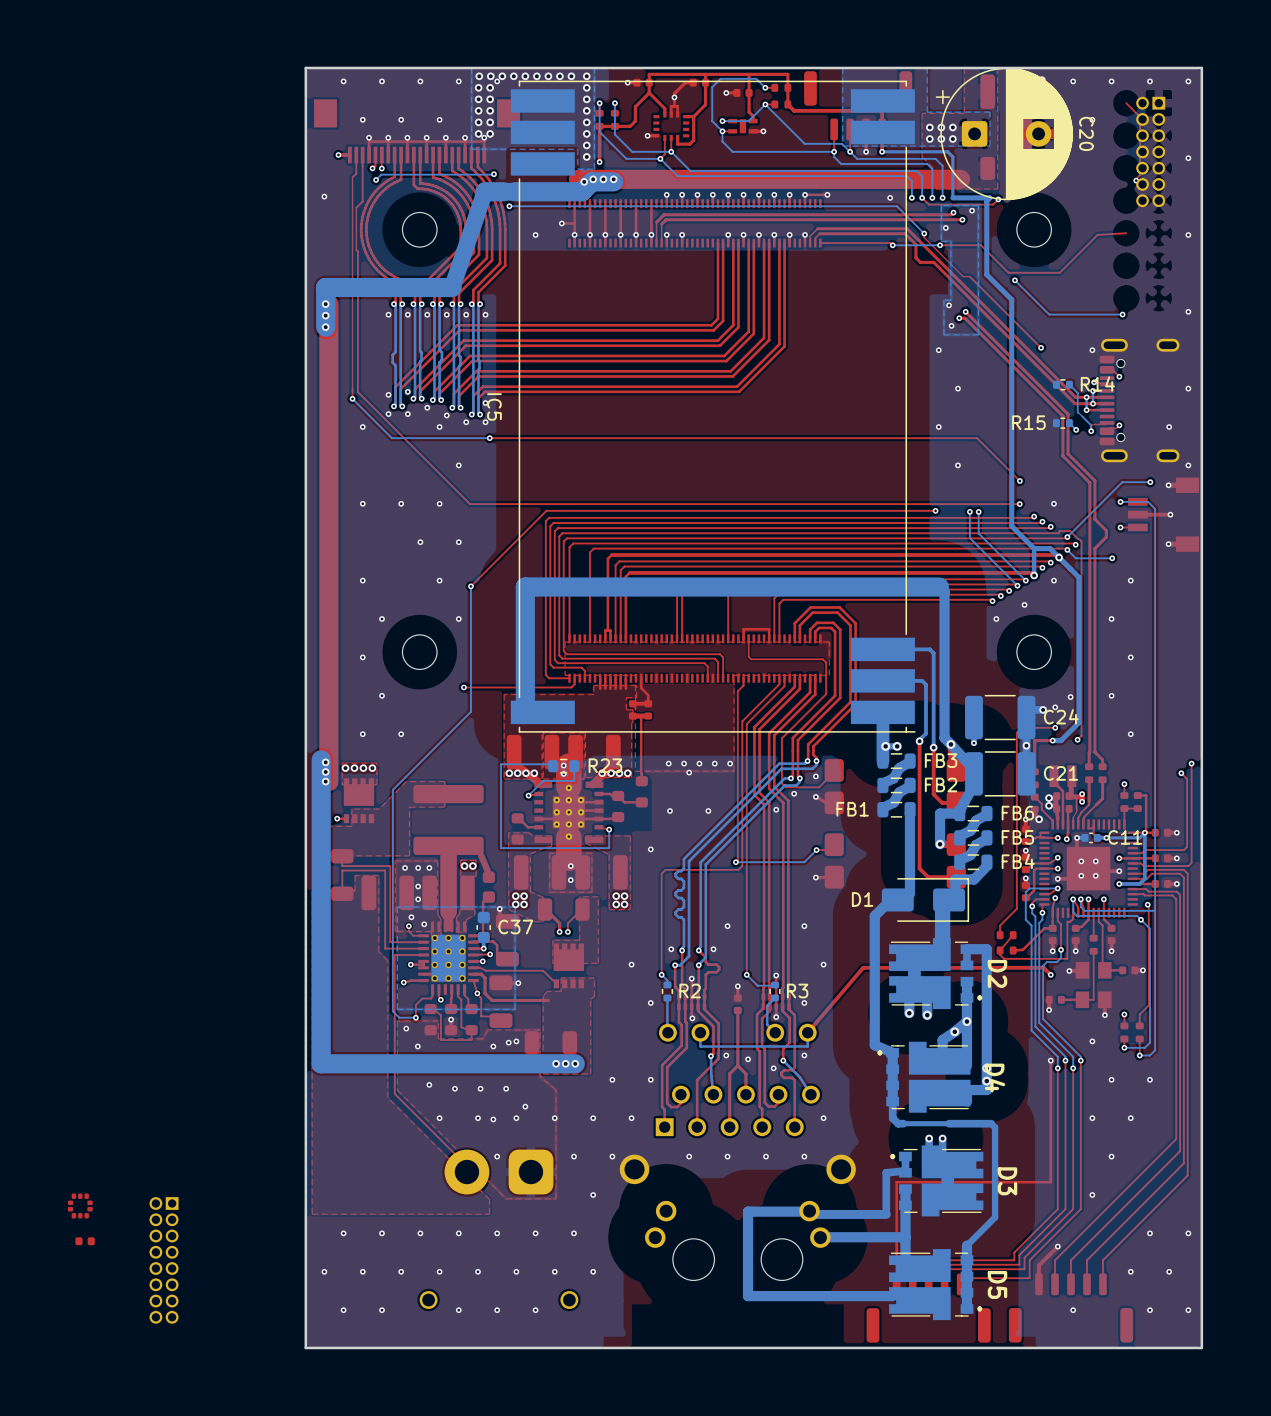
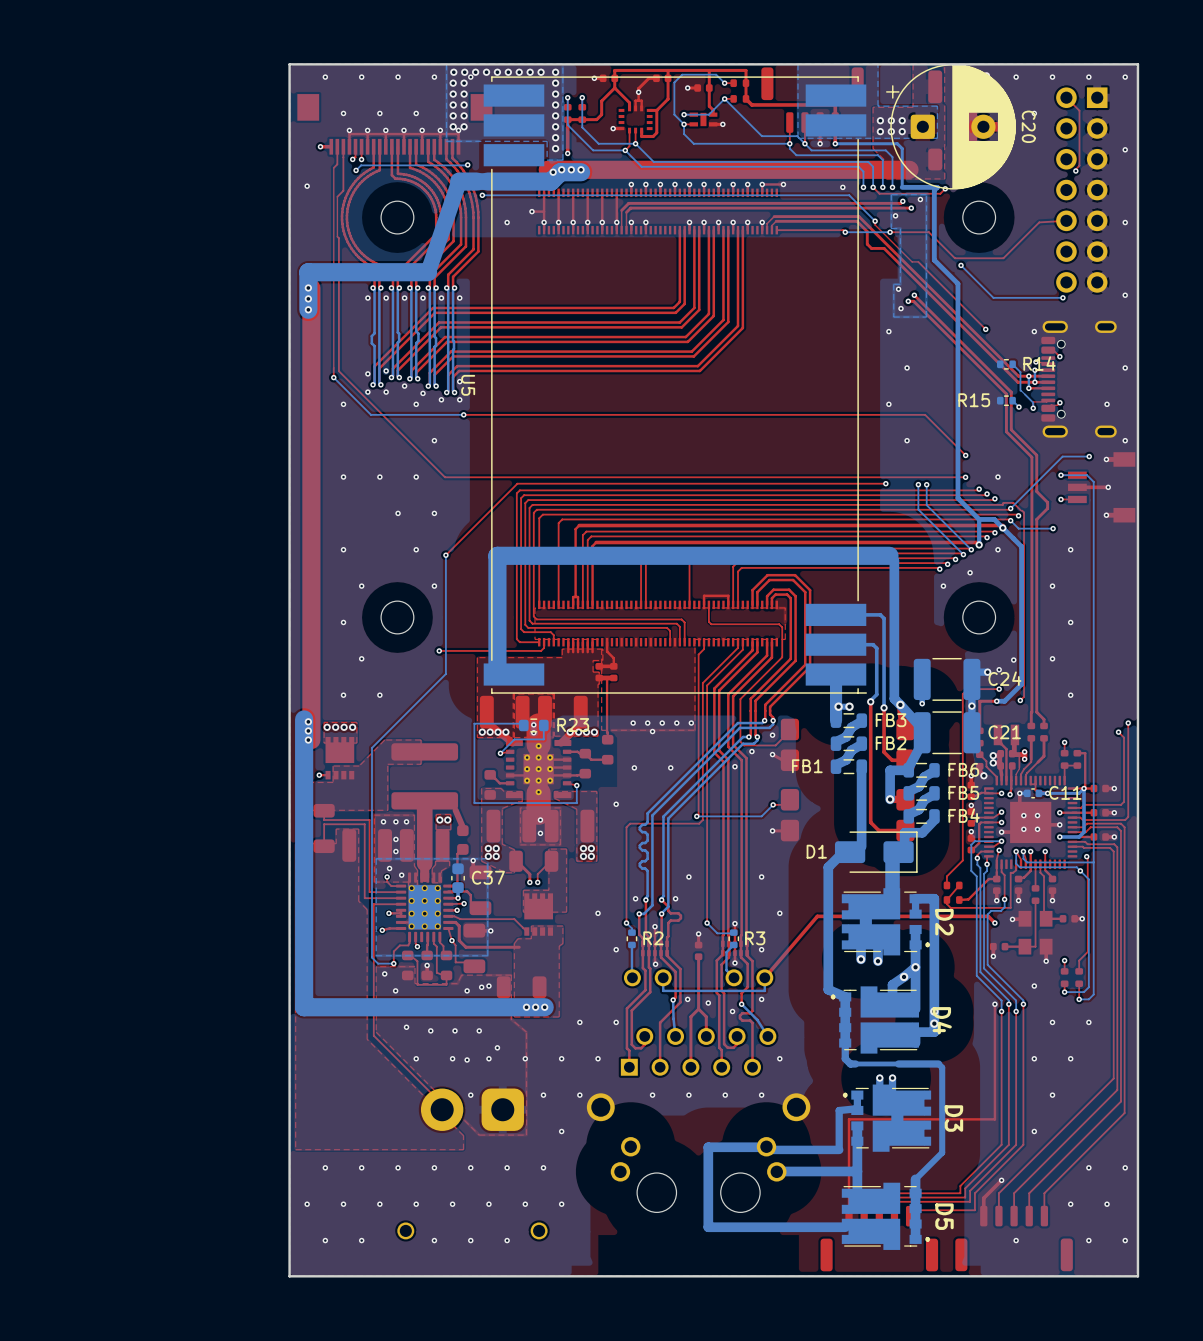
part: (1150, 151) -> none
part: none -> (1081, 190)
IC5 name: IC5 (494, 406) -> U5 (468, 385)
part: (80, 1206) -> none
part: (85, 1241) -> none
part: (164, 1260) -> none

